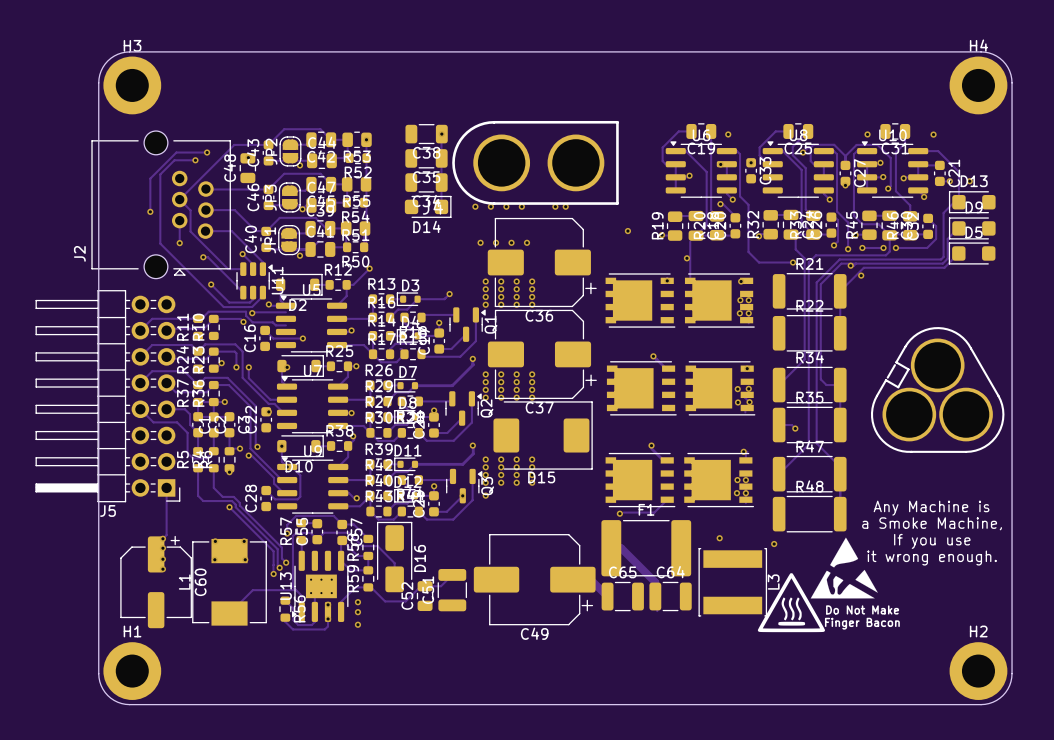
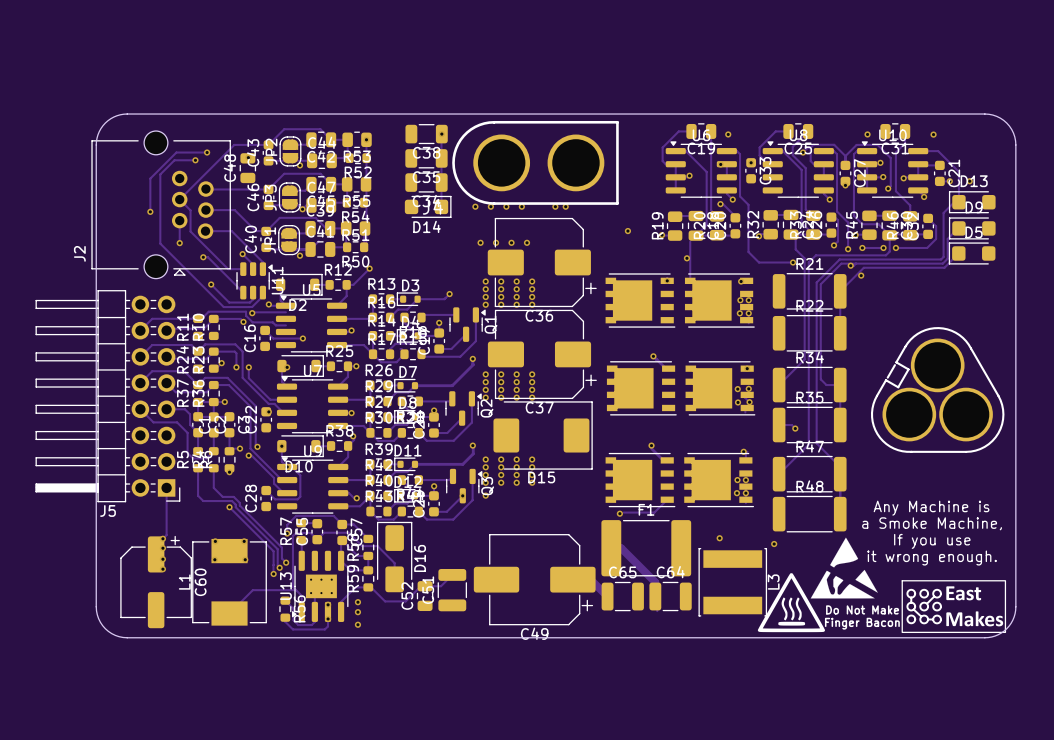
board edge: (129, 51) (981, 51) (989, 52) (999, 58) (1009, 71) (1012, 82) (1012, 673) (1010, 681) (1005, 692) (992, 702) (981, 704) (129, 704) (121, 703) (110, 698) (102, 689) (98, 673) (98, 82) (101, 71) (107, 60) (117, 54) (129, 51) -> (127, 114) (113, 117) (105, 123) (99, 131) (96, 144) (96, 606) (100, 622) (111, 633) (127, 637) (984, 637) (1001, 633) (1011, 623) (1015, 606) (1015, 144) (1011, 129) (1000, 118) (984, 114) (127, 114)
H3: (132, 85) -> none
H4: (978, 85) -> none
drawing: none -> [901, 580, 1006, 633]
H1: (132, 671) -> none
H2: (978, 671) -> none

